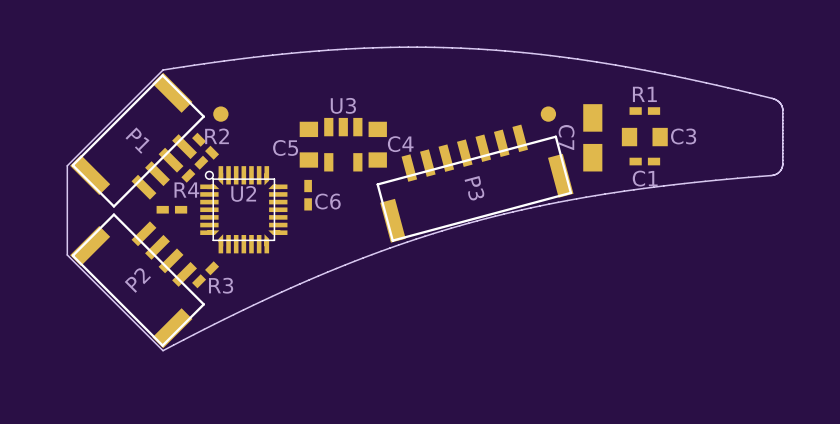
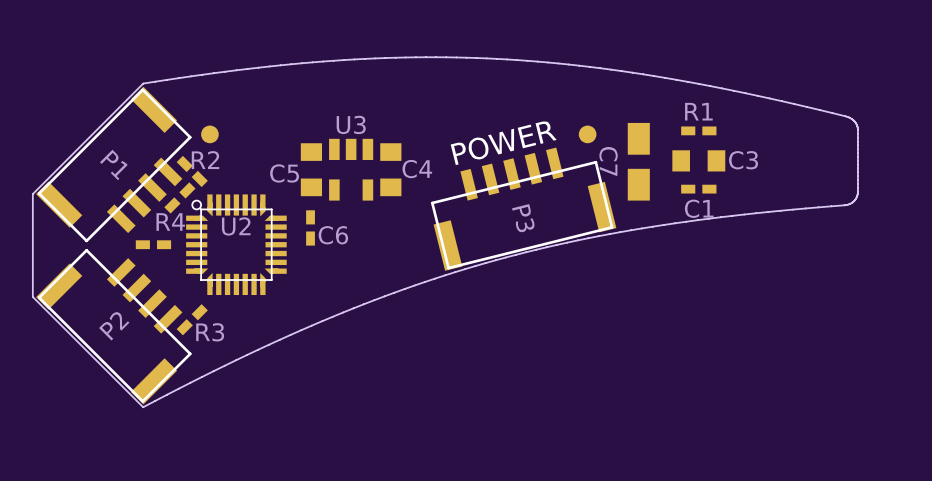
text: none -> POWER (503, 143)
P3 footprint: [376, 124, 574, 243] -> [431, 147, 617, 271]

